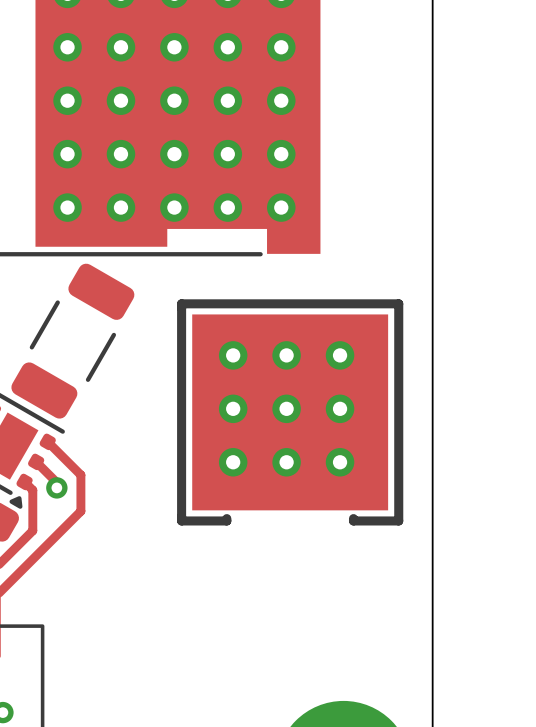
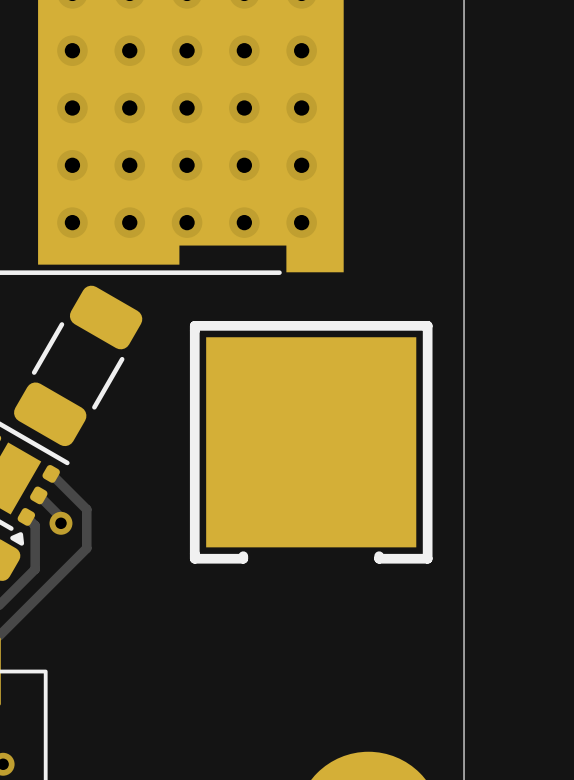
part footprint: [11, 263, 135, 419] -> [14, 285, 143, 447]
via: (233, 355) -> none
via: (286, 355) -> none
via: (340, 355) -> none
via: (233, 408) -> none
via: (286, 408) -> none
via: (340, 408) -> none
via: (233, 462) -> none
via: (286, 462) -> none
via: (340, 462) -> none

